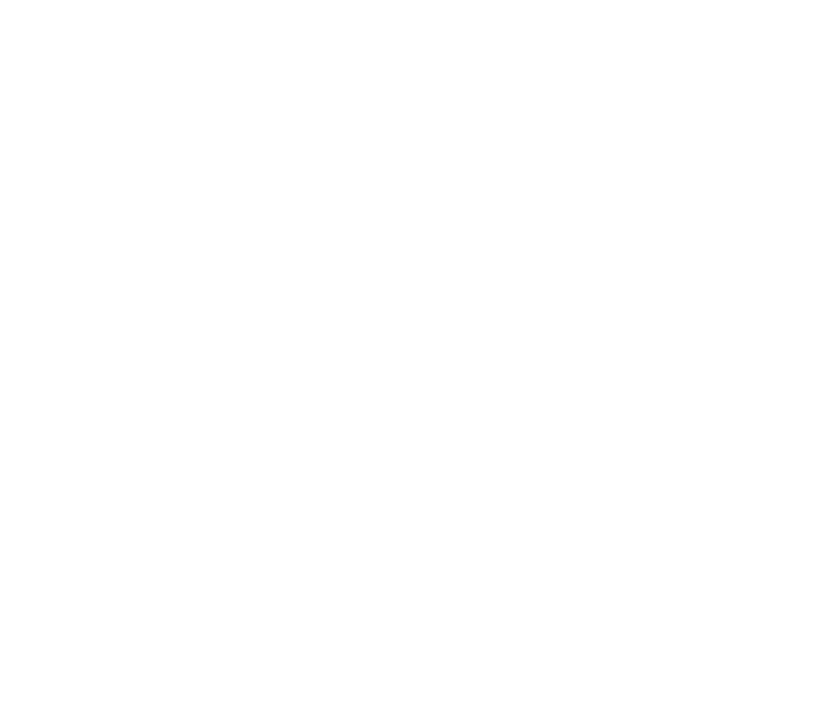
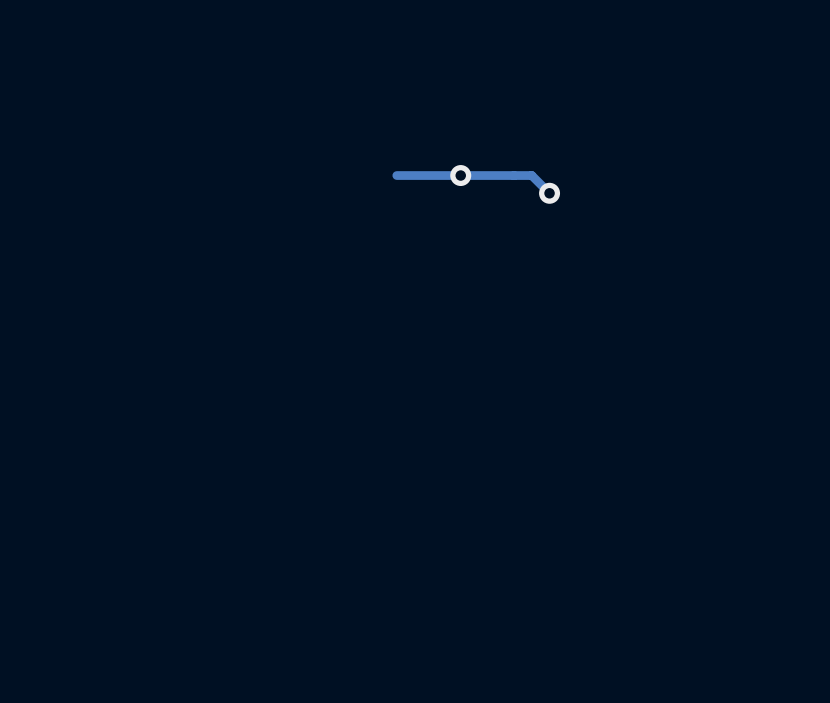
track: none -> (396, 175) (531, 175) (549, 193)
via: none -> (460, 175)
via: none -> (549, 193)

